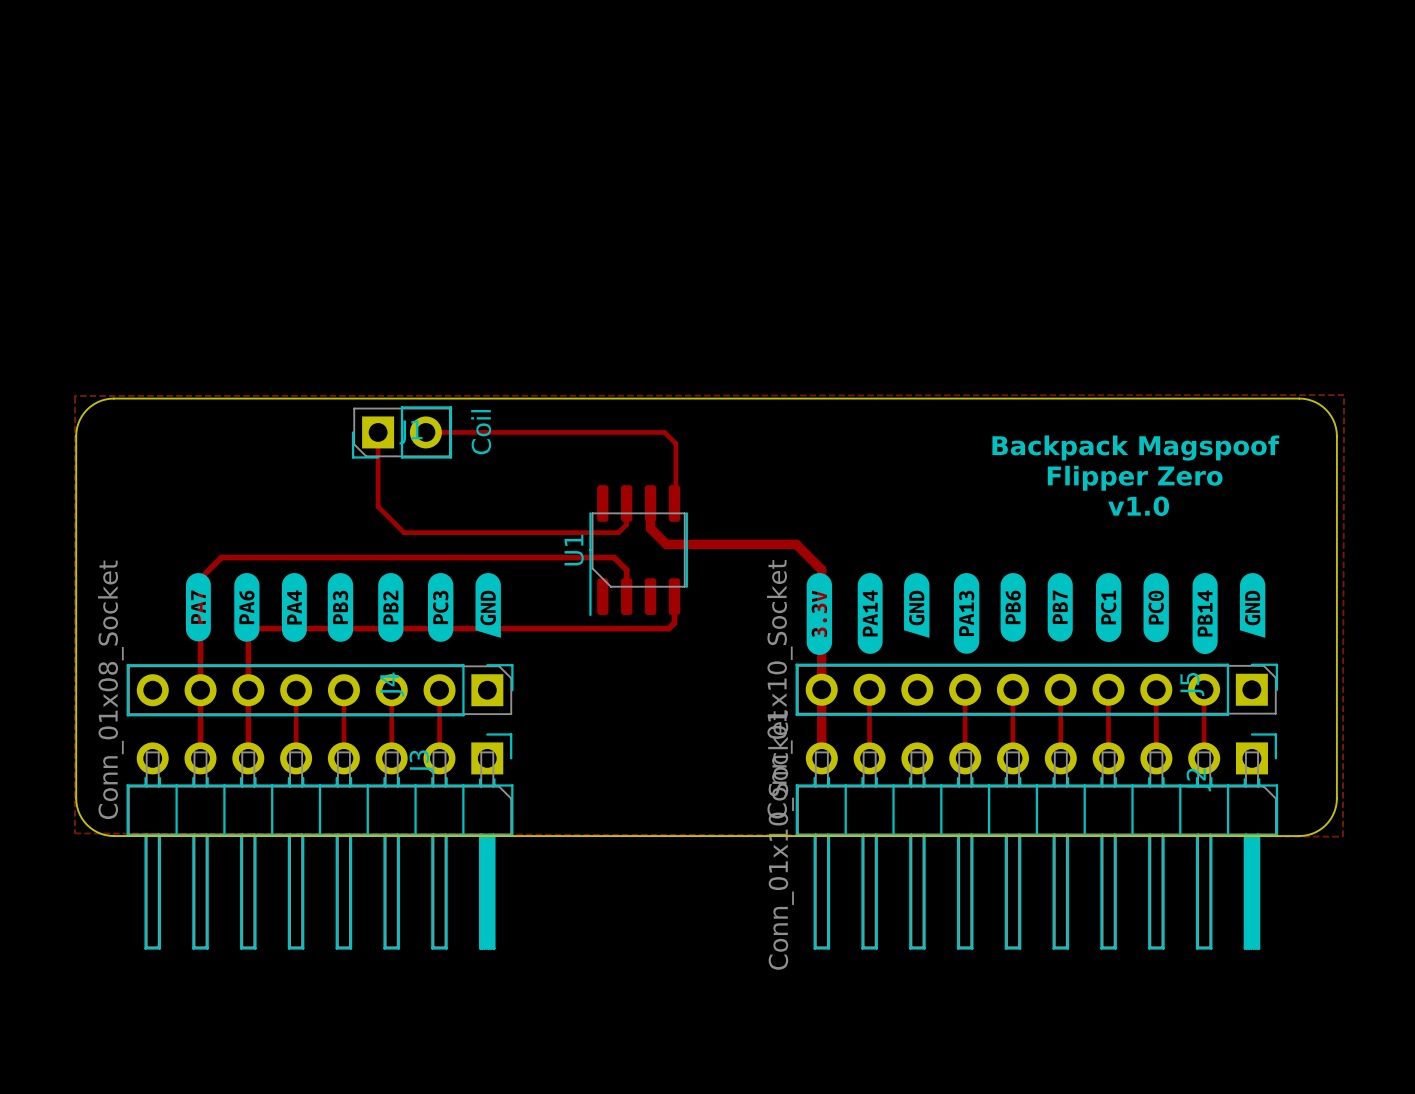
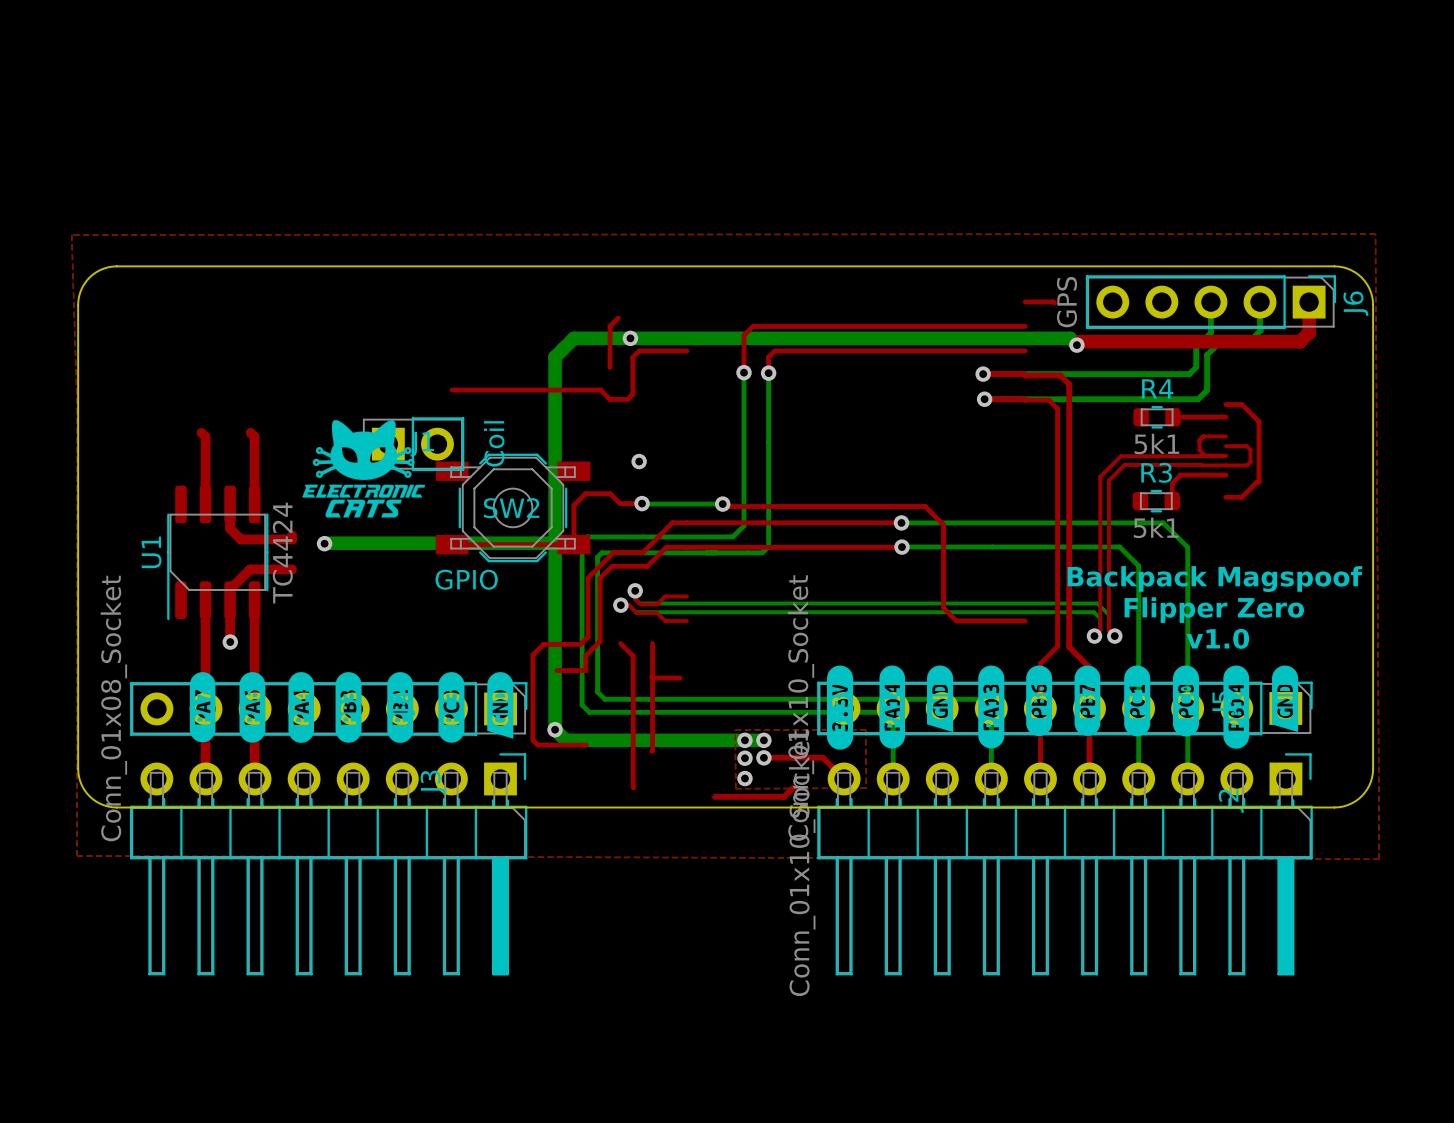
top track: none -> (1025, 301) (1054, 303)
bottom track: none -> (1210, 302) (1210, 332) (1196, 347) (1196, 367) (1189, 374) (983, 374)
J6: none -> GPS (1210, 302)
bottom track: none -> (1260, 302) (1260, 330) (1249, 341) (1220, 341) (1207, 355) (1207, 390) (1198, 399) (984, 399)
top track: none -> (1309, 302) (1309, 332) (1300, 341) (1080, 341) (1076, 345)
top track: none -> (618, 318) (610, 326) (610, 367)
top track: none -> (1025, 326) (752, 326) (743, 335) (743, 372)
via: none -> (630, 338)
bottom track: none -> (1076, 345) (1070, 338) (573, 338) (555, 357) (555, 729) (565, 740) (763, 740)
via: none -> (1076, 345)
top track: none -> (686, 351) (639, 351) (632, 357) (632, 394) (627, 399) (610, 399) (600, 390) (452, 390)
top track: none -> (1025, 351) (774, 351) (768, 357) (768, 373)
bottom track: none -> (743, 372) (743, 525) (732, 536) (586, 536) (582, 541) (582, 705) (589, 712) (881, 712) (893, 723) (893, 778)
via: none -> (743, 372)
bottom track: none -> (768, 373) (768, 546) (762, 552) (601, 552) (597, 557) (597, 692) (604, 699) (976, 699) (991, 713) (991, 778)
via: none -> (768, 373)
via: none -> (983, 374)
via: none -> (984, 399)
top track: none -> (1225, 404) (1241, 404) (1259, 421) (1259, 482) (1241, 497) (1225, 497)
top zone outline: (75, 397) (74, 395) (1343, 395) (1342, 836) -> (77, 408) (71, 234) (1375, 234) (1379, 859)
board edge: (113, 398) (1299, 398) (1311, 400) (1328, 412) (1336, 431) (1336, 798) (1334, 810) (1322, 827) (1311, 833) (1299, 836) (113, 836) (101, 833) (84, 821) (76, 802) (76, 436) (79, 419) (87, 409) (97, 402) (113, 398) -> (116, 266) (104, 268) (89, 277) (80, 292) (78, 305) (78, 768) (80, 781) (86, 792) (104, 805) (116, 807) (1334, 807) (1347, 805) (1358, 799) (1370, 781) (1373, 768) (1373, 305) (1370, 292) (1364, 280) (1347, 268) (1334, 266) (116, 266)
R4: none -> 5k1 (1157, 417)
top track: none -> (1173, 417) (1225, 417)
drawing: none -> [302, 420, 426, 518]
top track: none -> (201, 432) (205, 436) (205, 504)
top track: none -> (250, 432) (254, 436) (254, 504)
top track: none -> (1225, 436) (1203, 436) (1199, 440) (1199, 450) (1205, 455)
top track: (378, 432) (378, 506) (403, 532) (618, 532) (626, 524) (626, 503) -> none
top track: (425, 432) (664, 432) (675, 443) (674, 503) -> none
top track: none -> (1225, 446) (1246, 446) (1250, 449) (1250, 462) (1247, 465) (1124, 464) (1108, 480) (1108, 630) (1114, 636)
top track: none -> (1225, 455) (1121, 456) (1100, 476) (1100, 630) (1094, 636)
text position: Backpack Magspoof (1135, 448) -> Backpack Magspoof (1214, 579)
via: none -> (639, 461)
top track: none -> (1225, 475) (1180, 475) (1172, 483) (1172, 501)
text position: Flipper Zero (1135, 478) -> Flipper Zero (1214, 610)
R3: none -> 5k1 (1156, 501)
top track: none -> (642, 503) (620, 503) (610, 493) (585, 493) (573, 505) (573, 544) (452, 544)
bottom track: none -> (642, 503) (722, 504)
via: none -> (642, 503)
top track: none -> (722, 504) (725, 506) (925, 506) (943, 524) (943, 607) (956, 621) (1025, 621)
via: none -> (722, 504)
top track: none -> (230, 504) (230, 528) (240, 539) (292, 539) (292, 535)
SW2: none -> GPIO (513, 507)
top track: (650, 503) (650, 528) (666, 544) (796, 544) (821, 569) (821, 758) -> (764, 757) (822, 757) (844, 778)
text position: v1.0 (1138, 506) -> v1.0 (1217, 638)
top track: none -> (901, 522) (672, 522) (642, 552) (613, 552) (588, 578) (588, 637) (580, 644) (543, 644) (532, 655) (532, 740) (537, 745) (586, 745)
bottom track: none -> (901, 522) (1163, 522) (1187, 547) (1187, 778)
via: none -> (901, 522)
bottom track: none -> (555, 543) (324, 543)
via: none -> (324, 543)
top track: none -> (901, 547) (666, 547) (647, 566) (612, 566) (600, 578) (600, 641) (585, 655) (585, 670) (556, 670)
bottom track: none -> (902, 546) (1119, 546) (1138, 565) (1138, 778)
via: none -> (901, 547)
U1 value: none -> TC4424 (282, 553)
U1 position: (638, 550) -> (217, 552)
top track: none -> (292, 569) (250, 569) (230, 589) (230, 641)
top track: none -> (635, 590) (635, 599) (640, 604) (657, 604) (665, 596) (686, 596)
bottom track: none -> (635, 590) (635, 599) (639, 603) (1097, 603) (1108, 614) (1108, 630) (1114, 636)
via: none -> (635, 590)
top track: none -> (620, 605) (629, 605) (636, 613) (657, 613) (665, 621) (686, 621)
bottom track: none -> (620, 605) (629, 605) (636, 612) (1093, 612) (1100, 618) (1100, 630) (1094, 636)
via: none -> (620, 605)
top track: (626, 596) (626, 569) (614, 557) (221, 557) (200, 578) (200, 758) -> (205, 600) (205, 778)
top track: (674, 596) (674, 622) (668, 628) (257, 628) (248, 637) (248, 758) -> (254, 600) (254, 778)
drawing position: (488, 605) -> (500, 705)
drawing position: (916, 605) -> (940, 698)
drawing position: (1252, 605) -> (1285, 698)
drawing position: (198, 607) -> (202, 707)
drawing position: (246, 607) -> (252, 707)
drawing position: (294, 607) -> (301, 707)
drawing position: (340, 607) -> (348, 707)
drawing position: (390, 607) -> (400, 707)
drawing position: (440, 607) -> (451, 707)
drawing position: (1013, 607) -> (1039, 700)
drawing position: (1060, 607) -> (1087, 700)
drawing position: (1108, 607) -> (1137, 700)
drawing position: (1156, 607) -> (1186, 701)
drawing position: (870, 613) -> (892, 707)
drawing position: (966, 613) -> (991, 706)
drawing position: (1205, 613) -> (1236, 707)
drawing position: (819, 614) -> (840, 707)
via: none -> (1094, 636)
via: none -> (1114, 636)
via: none -> (230, 642)
top track: none -> (620, 643) (633, 656) (633, 787)
top track: none -> (652, 643) (651, 751)
top track: none -> (651, 676) (680, 678)
top track: (869, 689) (869, 758) -> none
top track: (965, 689) (965, 758) -> none
top track: (1012, 689) (1012, 758) -> (984, 399) (1048, 400) (1057, 408) (1057, 646) (1040, 663) (1040, 778)
top track: (1060, 689) (1060, 758) -> (983, 374) (1060, 375) (1069, 384) (1069, 647) (1089, 667) (1089, 778)
top track: (1108, 689) (1108, 758) -> none
top track: (1156, 689) (1156, 758) -> none
top track: (1204, 689) (1204, 758) -> none
top track: (296, 690) (296, 758) -> none
top track: (343, 690) (343, 758) -> none
top track: (391, 690) (391, 758) -> none
top track: (439, 690) (439, 758) -> none
via: none -> (555, 729)
top zone outline: none -> (865, 729) (735, 730) (735, 788) (866, 788) (865, 729)
via: none -> (744, 740)
via: none -> (763, 740)
via: none -> (763, 757)
via: none -> (744, 758)
via: none -> (744, 778)
top track: none -> (793, 787) (784, 796) (715, 796)

